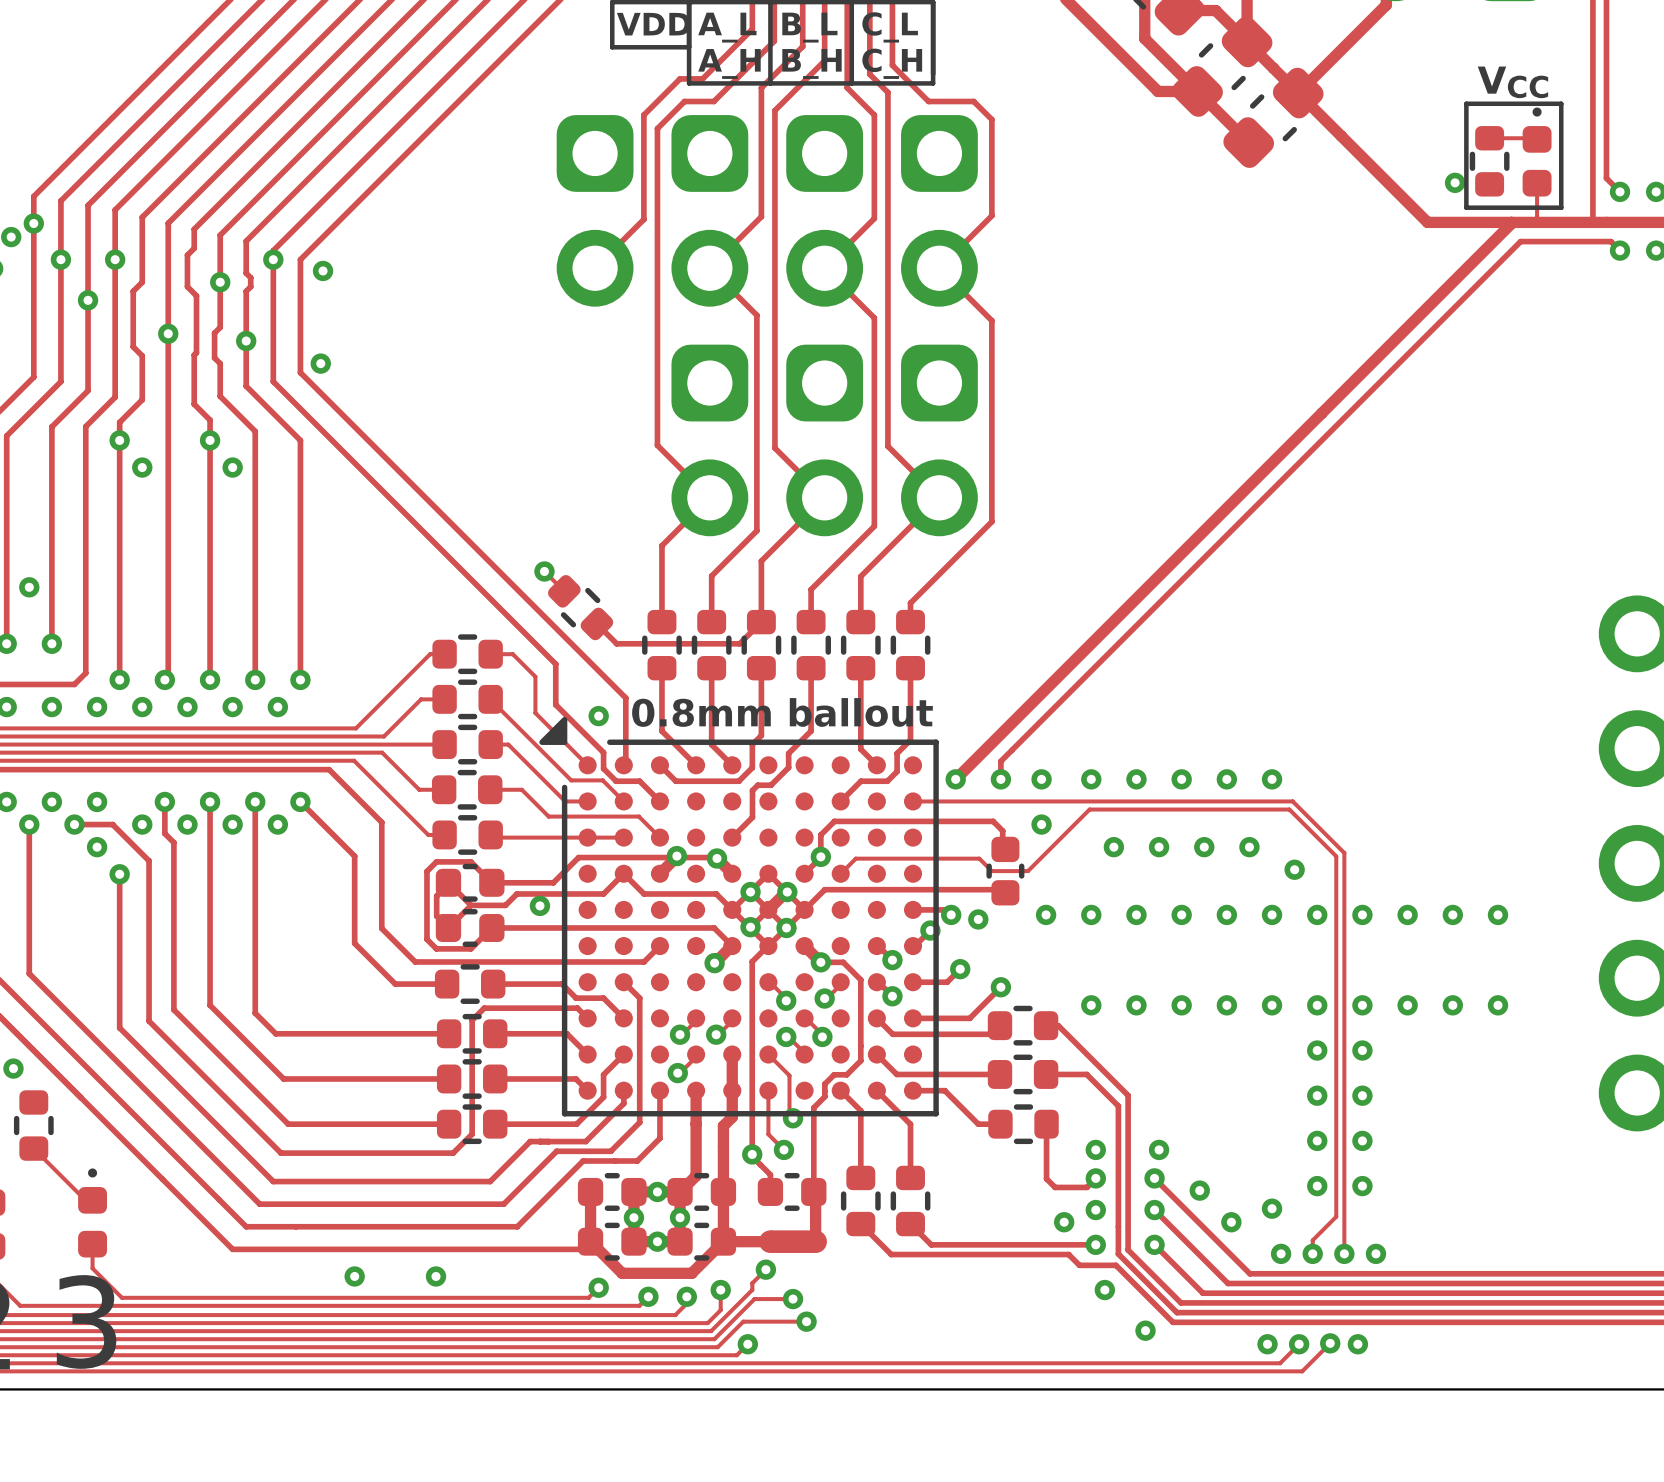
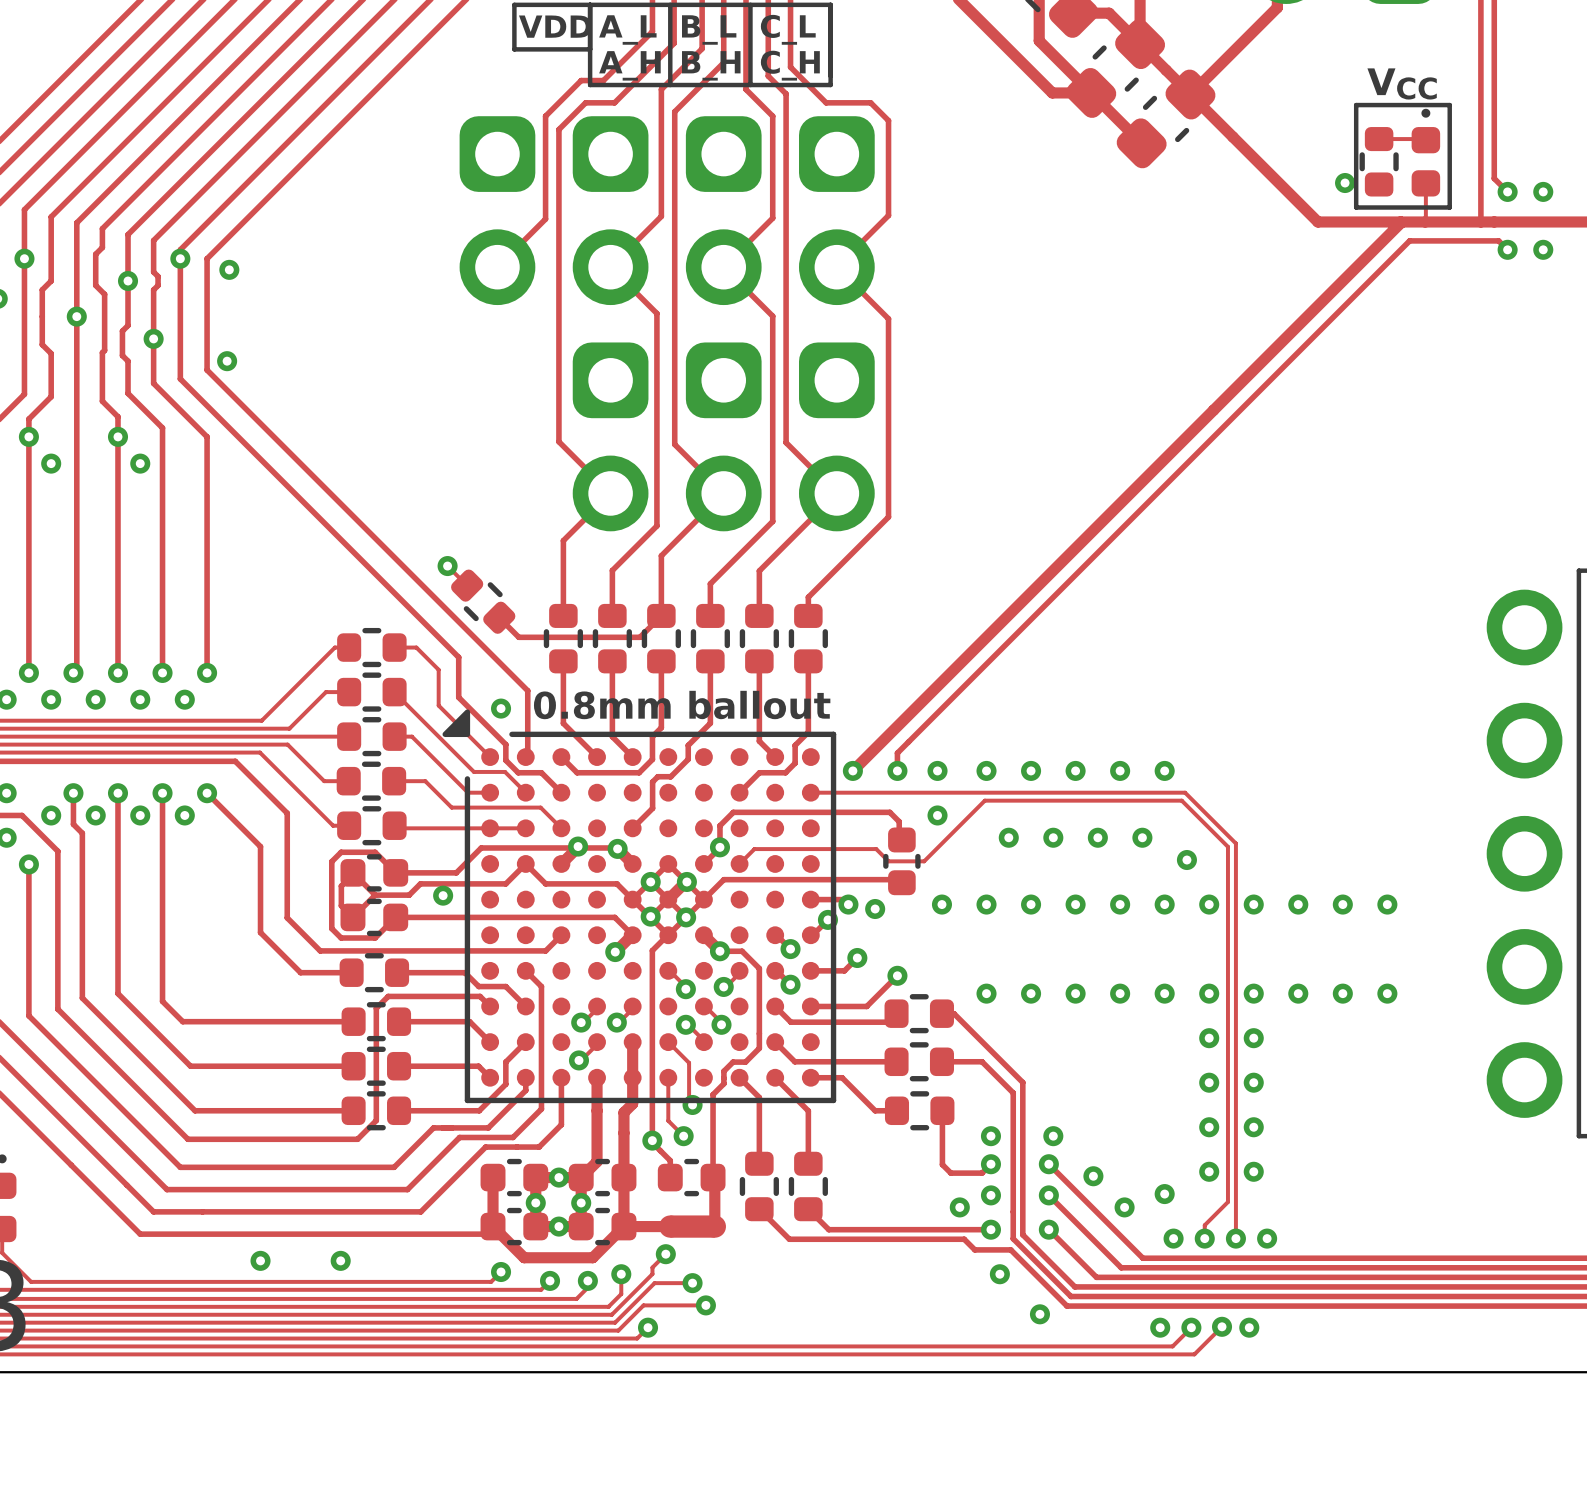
via position: (168, 333) -> (76, 316)

